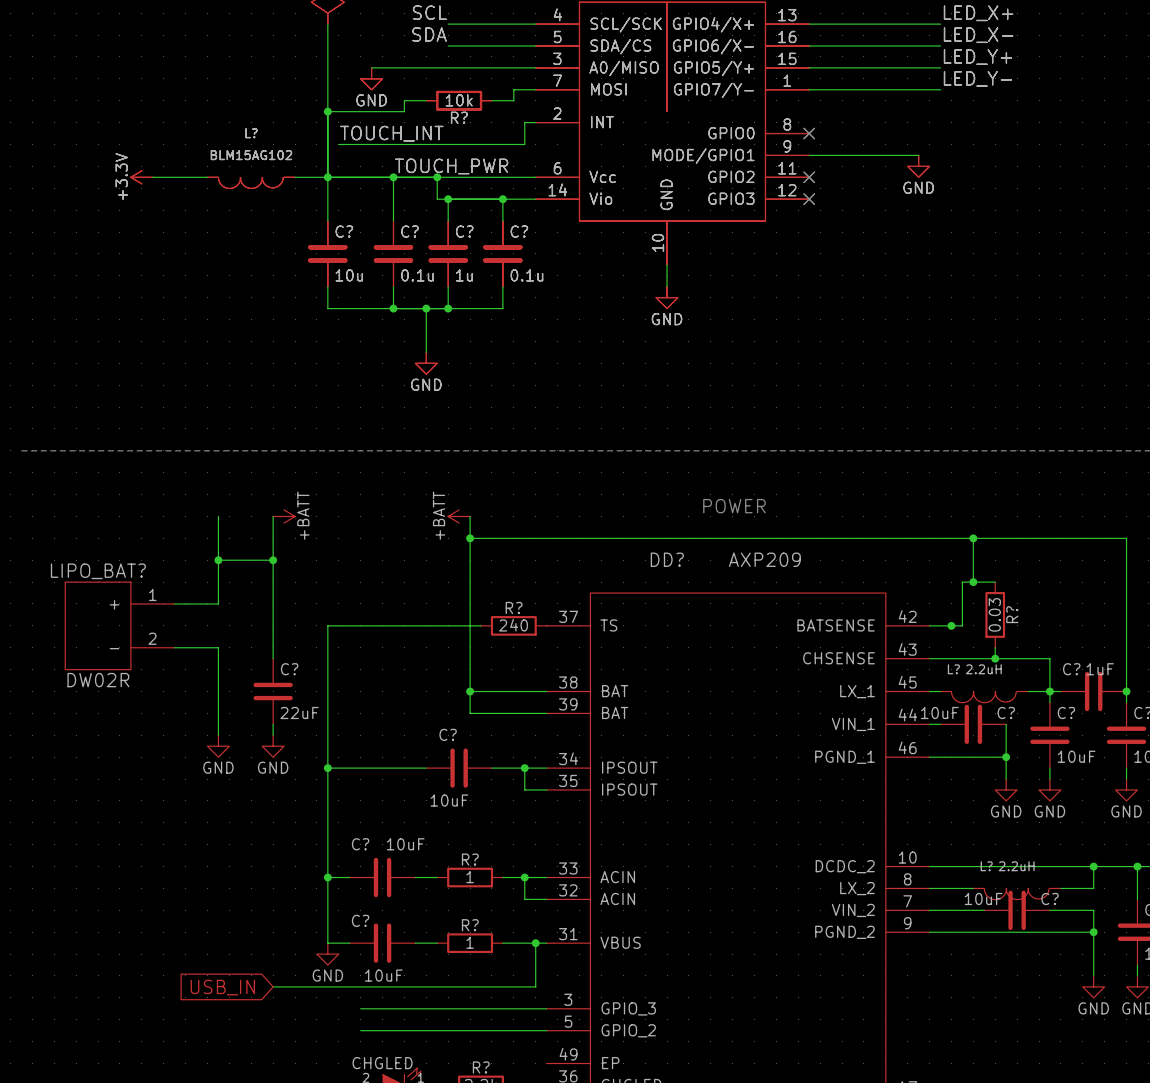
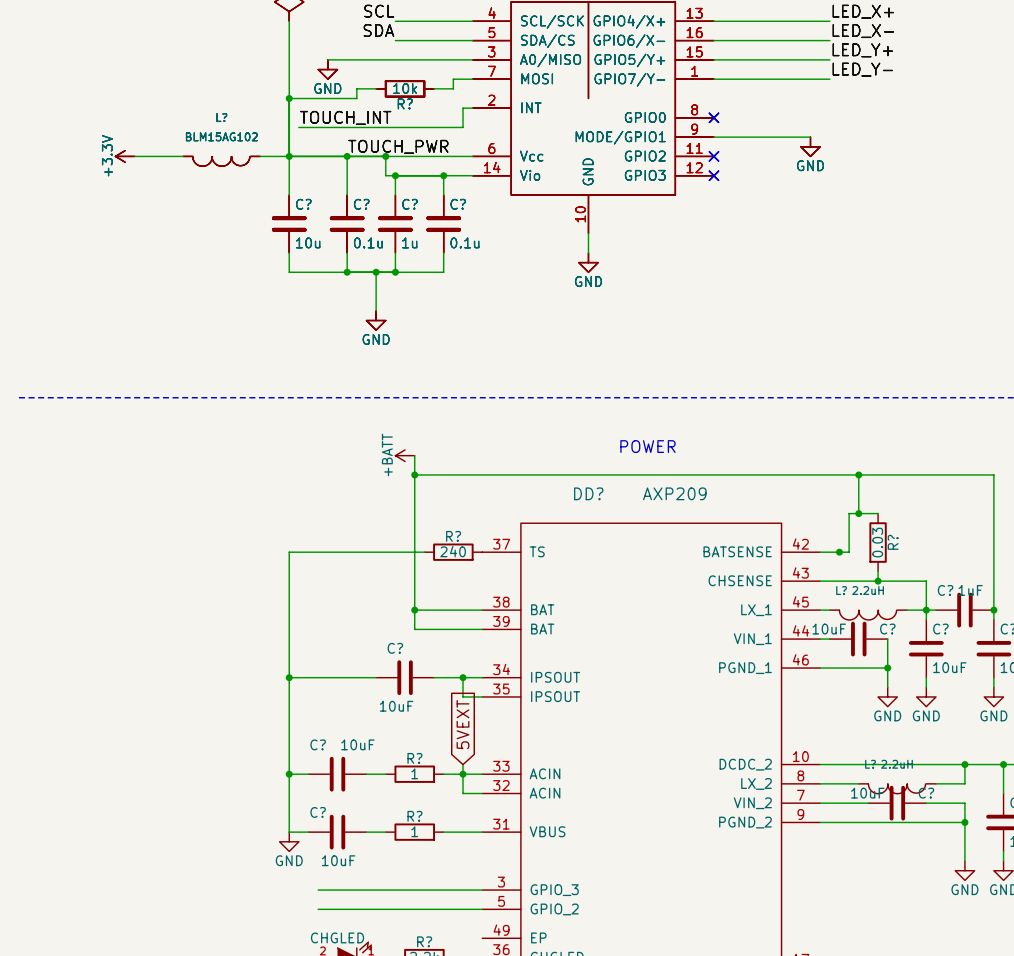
wire: (218, 516) (218, 603) (174, 603) -> none
wire: (273, 516) (273, 658) -> none
power symbol: +BATT (284, 516) -> none
wire: (218, 560) (273, 560) -> none
junction: (218, 560) -> none
junction: (273, 560) -> none
LIPO_BAT?: DW02R (119, 625) -> none
wire: (174, 647) (218, 647) (218, 735) -> none
C?: 22uF (273, 691) -> none
wire: (273, 724) (273, 735) -> none
power symbol: GND (218, 746) -> none
power symbol: GND (273, 746) -> none
global label: none -> 5VEXT (462, 724)
wire: none -> (462, 764) (462, 774)
wire: (535, 943) (535, 986) (273, 986) -> none
junction: (535, 943) -> none
global label: USB_IN (222, 987) -> none

